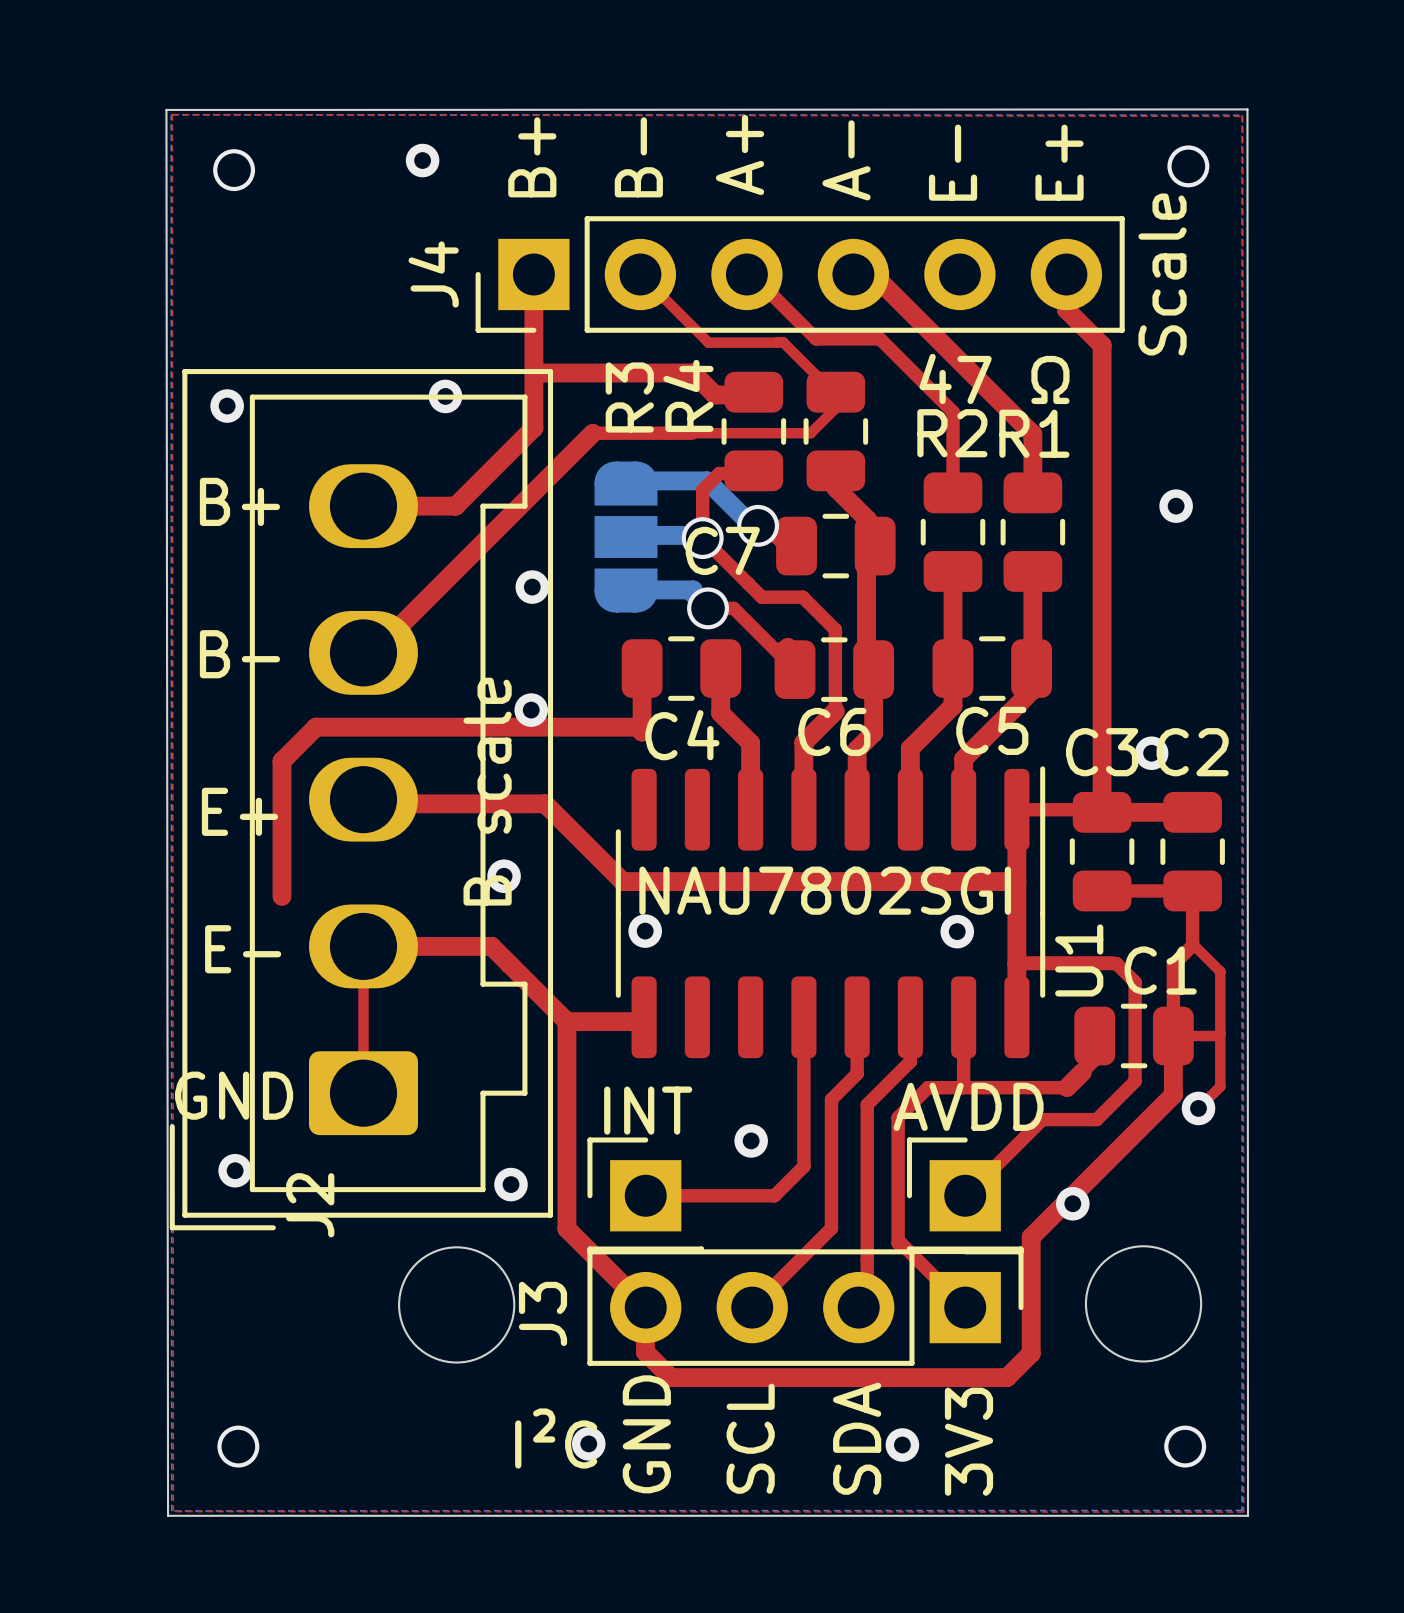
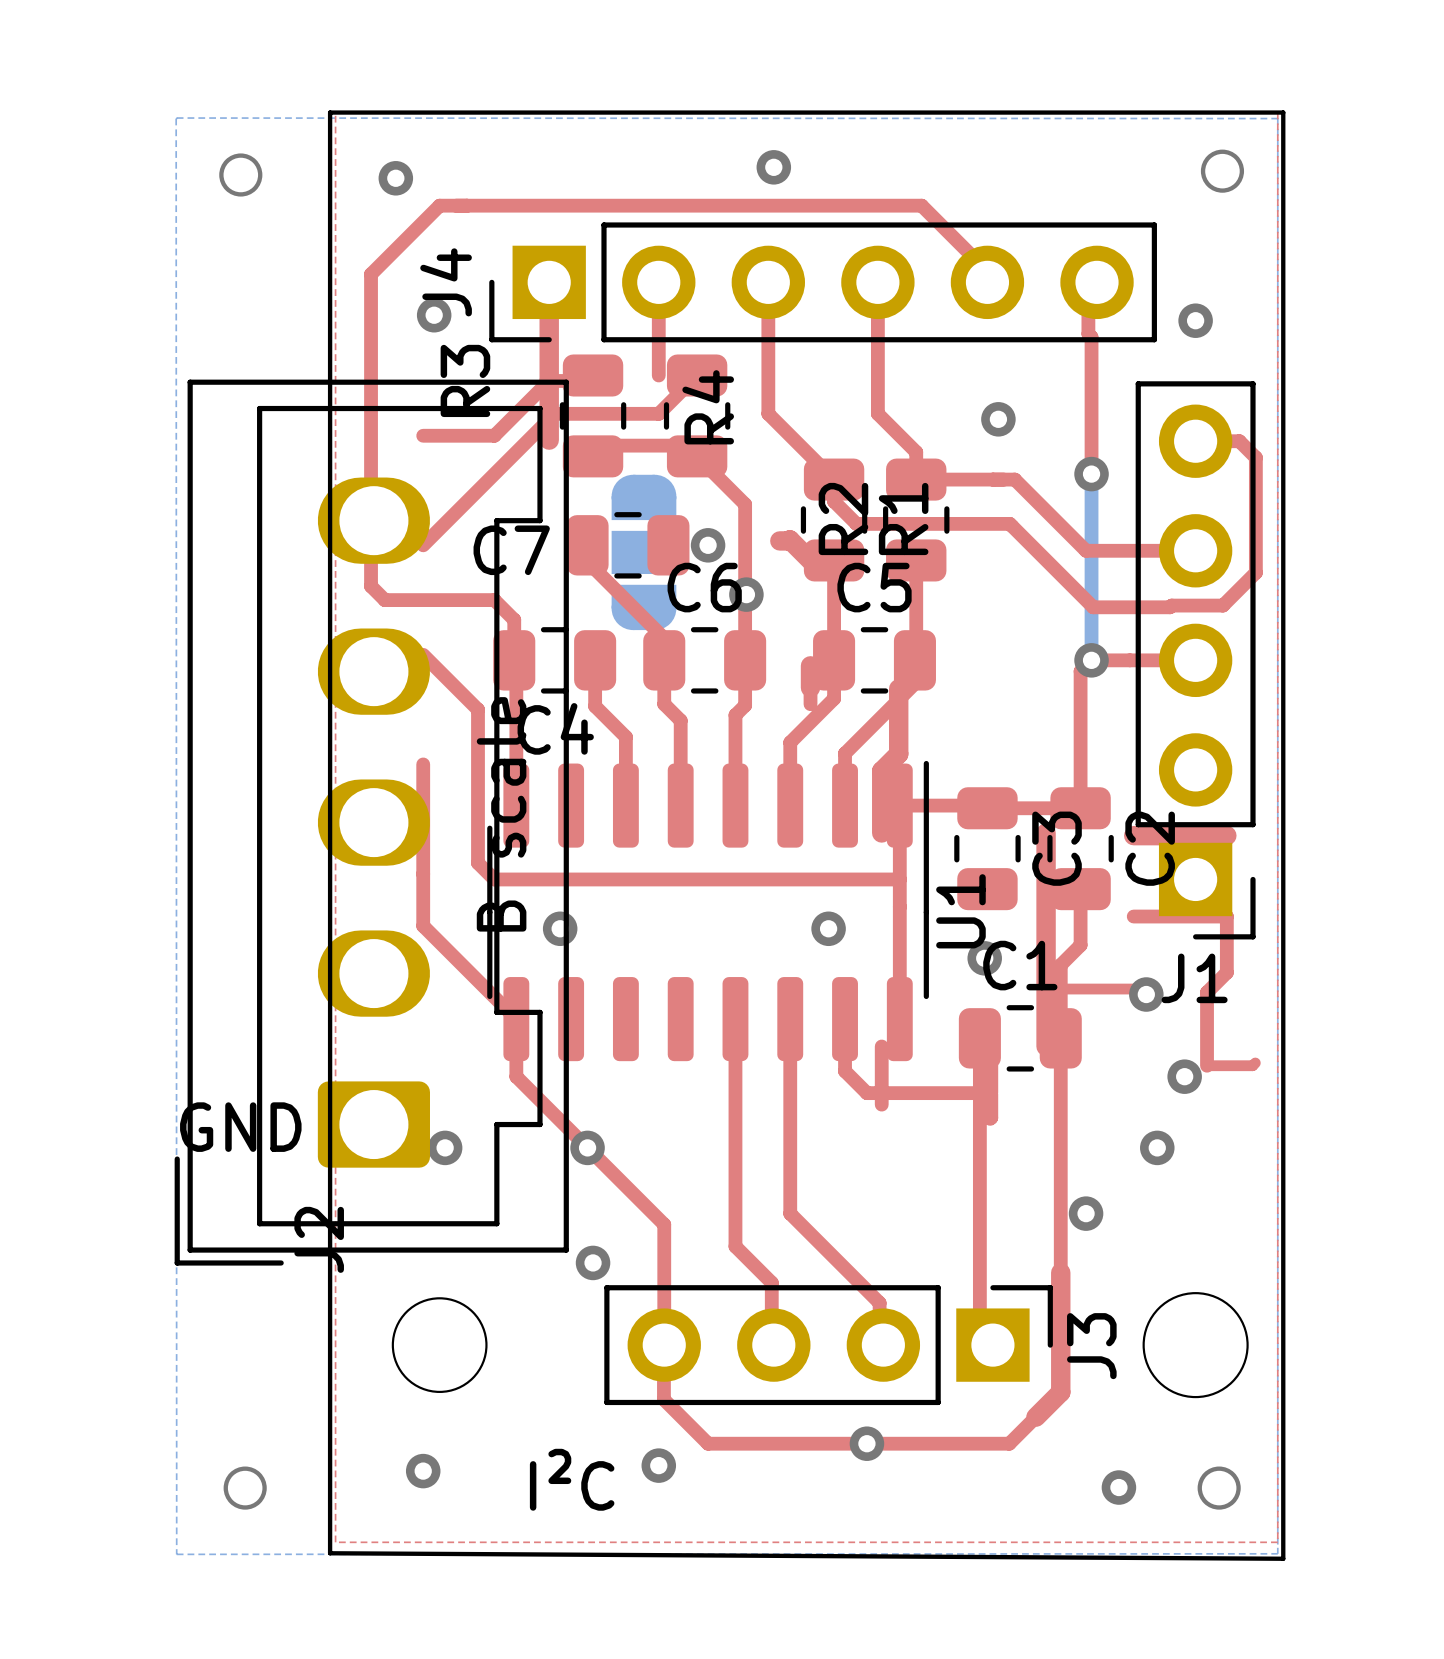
board edge: (1247, 109) (166, 109) (168, 1515) (1248, 1515) (1247, 109) -> (330, 112) (330, 1553) (1283, 1558) (1283, 112) (330, 112)
top zone outline: (172, 114) (173, 1511) (1243, 1512) (1242, 116) (172, 114) -> (335, 112) (335, 1542) (1277, 1542) (1277, 112) (335, 112)
text: A+ (740, 155) -> none
text: B+ (532, 157) -> none
text: B- (638, 157) -> none
via position: (422, 160) -> (395, 178)
text: A- (846, 160) -> none
via: none -> (773, 167)
text: E- (953, 162) -> none
text: E+ (1059, 162) -> none
top track: none -> (980, 264) (921, 205) (439, 205) (371, 274) (371, 586) (384, 600) (494, 600) (514, 619) (514, 660) (516, 662) (516, 805) (521, 800) (518, 803)
top track: none -> (1088, 276) (1088, 334) (1091, 337) (1091, 474)
top track: (640, 274) (708, 342) (777, 342) -> (658, 282) (658, 375)
top track: (746, 274) (751, 274) (816, 338) (880, 338) (952, 411) (952, 492) -> (768, 282) (768, 413) (834, 479) (834, 501) (856, 523) (1009, 523) (1093, 607) (1223, 605) (1255, 572) (1255, 457) (1239, 441) (1195, 441)
top track: (853, 274) (873, 274) (1032, 434) (1032, 492) -> (877, 282) (877, 413) (916, 452) (916, 479) (1014, 479) (1086, 550) (1212, 550)
J4 value: Scale (1162, 274) -> none
top track: (1050, 290) (1066, 274) (1066, 309) (1102, 345) (1102, 812) (1099, 809) (1016, 809) (1016, 1017) (1014, 1015) -> none
via: none -> (434, 315)
via: none -> (1195, 320)
top track: (777, 342) (783, 342) (835, 394) -> none
top track: none -> (702, 370) (658, 413) (554, 413) (423, 545)
top track: none -> (593, 375) (587, 375) (582, 380) (549, 380) (494, 435) (423, 435)
top track: (538, 373) (693, 373) (715, 394) (755, 394) -> none
top track: (533, 377) (533, 427) (455, 506) (363, 506) (416, 506) -> none
R1 value: 47 Ω (994, 378) -> none
top track: (835, 394) (835, 408) (810, 433) (592, 433) (373, 652) (363, 652) -> none
via: (445, 396) -> none
via: (227, 406) -> none
via: none -> (998, 419)
R3 position: (753, 431) -> (593, 415)
R4 position: (835, 431) -> (697, 415)
R2 name rotation: 0° (952, 433) -> 90° counterclockwise (843, 518)
R1 name rotation: 0° (1034, 433) -> 90° counterclockwise (903, 518)
top track: none -> (697, 456) (745, 504) (745, 705) (735, 715) (735, 805)
bottom track: none -> (1091, 474) (1091, 660)
via: none -> (1091, 474)
top track: (755, 473) (719, 473) (702, 490) (702, 538) (761, 597) (802, 597) (835, 629) (835, 711) (803, 742) (803, 809) -> none
top track: (835, 473) (835, 488) (867, 519) (866, 668) (862, 664) -> none
bottom track: (654, 480) (707, 480) (752, 525) (758, 525) -> none
text: B+ (239, 501) -> none
via: (1176, 506) -> none
via size: [681, 517, 724, 560] -> [690, 528, 726, 563]
via: (758, 525) -> none
R1 position: (952, 532) -> (834, 520)
R2 position: (1032, 532) -> (916, 520)
bottom track: (654, 535) (700, 535) (702, 538) -> none
top track: none -> (593, 554) (593, 567) (664, 638) (664, 704) (680, 720) (680, 805) (680, 758)
C7 position: (835, 546) -> (628, 545)
top track: (952, 571) (952, 705) (910, 748) (910, 809) -> (834, 560) (834, 698) (790, 742) (790, 805)
top track: (1032, 571) (1031, 691) (963, 759) (963, 809) -> (916, 560) (914, 683) (845, 753) (845, 805)
via: (532, 587) -> none
bottom track: (692, 589) (654, 589) (693, 589) (693, 593) (708, 608) -> none
top track: (708, 608) (733, 608) (795, 669) -> none
via position: (708, 608) -> (746, 594)
top track: none -> (423, 654) (478, 709) (478, 863) (494, 879) (899, 879)
via: none -> (1091, 660)
J1: none -> (1195, 660)
top track: none -> (1212, 660) (1091, 660) (1080, 671) (1080, 808) (899, 805) (899, 1019) (897, 1017)
text: B- (239, 654) -> none
C4 position: (681, 668) -> (554, 660)
top track: (720, 668) (720, 713) (750, 743) (750, 809) -> (595, 660) (595, 706) (625, 737) (625, 805)
C5 position: (992, 668) -> (874, 660)
C6 position: (834, 669) -> (704, 660)
via: (531, 710) -> none
top track: (644, 728) (644, 670) (642, 668) (642, 732) (637, 727) (316, 727) (282, 761) (282, 896) -> none
C5 name position: C5 (992, 730) -> C5 (874, 587)
C6 name position: C6 (834, 731) -> C6 (704, 587)
top track: none -> (423, 764) (423, 925) (516, 1019) (516, 1076) (664, 1224) (664, 1345)
C3 name rotation: 0° (1102, 752) -> 90° counterclockwise (1057, 848)
C2 name rotation: 0° (1192, 752) -> 90° counterclockwise (1150, 848)
top track: (363, 799) (367, 803) (545, 803) (622, 881) (1016, 881) -> none
text: E+ (239, 811) -> none
C3 position: (1102, 851) -> (987, 848)
C2 position: (1192, 851) -> (1080, 848)
via position: (504, 876) -> (560, 928)
U1 value: NAU7802SGI (825, 890) -> none
top track: (1192, 890) (1192, 943) (1220, 971) (1220, 1086) (1198, 1108) -> none
via: none -> (828, 928)
U1 position: (830, 912) -> (708, 911)
via: (645, 931) -> none
top track: (331, 946) (491, 946) (566, 1021) -> none
top track: (363, 946) (363, 1093) -> none
text: E- (243, 949) -> none
U1 name position: U1 (1079, 960) -> U1 (960, 911)
top track: (1016, 963) (1116, 963) (1135, 982) (1135, 1081) (1096, 1119) (1042, 1119) (966, 1195) (959, 1190) -> none
via: none -> (1146, 994)
C1 name position: C1 (1160, 970) -> C1 (1020, 965)
top track: none -> (735, 1019) (735, 1246) (771, 1282) (771, 1350)
top track: none -> (790, 1019) (790, 1213) (879, 1303) (879, 1350)
top track: none -> (845, 1019) (845, 1071) (866, 1093) (976, 1093) (979, 1096)
top track: (644, 1017) (639, 1021) (566, 1021) -> none
top track: (803, 1017) (803, 1166) (774, 1195) (645, 1195) -> none
top track: (910, 1017) (910, 1061) (867, 1104) (867, 1299) (858, 1307) (858, 1290) (867, 1281) -> none
top track: (566, 1021) (566, 1228) (645, 1307) (645, 1352) (670, 1377) (1007, 1377) -> (663, 1390) (663, 1399) (708, 1443) (1009, 1443) (1035, 1417)
top track: (1094, 1036) (1094, 1059) (1066, 1087) (928, 1087) (898, 1117) (898, 1243) (900, 1243) (952, 1294) -> (979, 1038) (979, 1332)
C1 position: (1134, 1036) -> (1020, 1038)
top track: (1173, 1036) (1173, 1095) (1031, 1237) -> (1080, 889) (1080, 945) (1060, 965) (1060, 1272)
via: none -> (1184, 1076)
top track: (857, 1073) (831, 1099) (831, 1228) (752, 1307) (831, 1228) (831, 1099) (857, 1073) -> none
text: AVDD (968, 1106) -> none
via: (1198, 1108) -> none
text: INT (648, 1110) -> none
via: none -> (445, 1147)
via: none -> (587, 1147)
via: none -> (1157, 1147)
via: (751, 1140) -> none
via: (235, 1170) -> none
via: (511, 1184) -> none
part: (645, 1195) -> none
part: (965, 1195) -> none
via position: (1072, 1203) -> (1086, 1213)
via: none -> (593, 1262)
round board edge size: [1084, 1245, 1203, 1363] -> [1142, 1292, 1249, 1399]
round board edge size: [398, 1246, 516, 1364] -> [391, 1297, 488, 1393]
J3 name position: J3 (542, 1313) -> J3 (1091, 1346)
via: none -> (423, 1471)
text: GND (646, 1434) -> none
text: SCL (750, 1438) -> none
text: SDA (857, 1438) -> none
text: 3V3 (969, 1441) -> none
via position: (588, 1443) -> (658, 1465)
via position: (902, 1444) -> (866, 1443)
via: none -> (1118, 1487)

